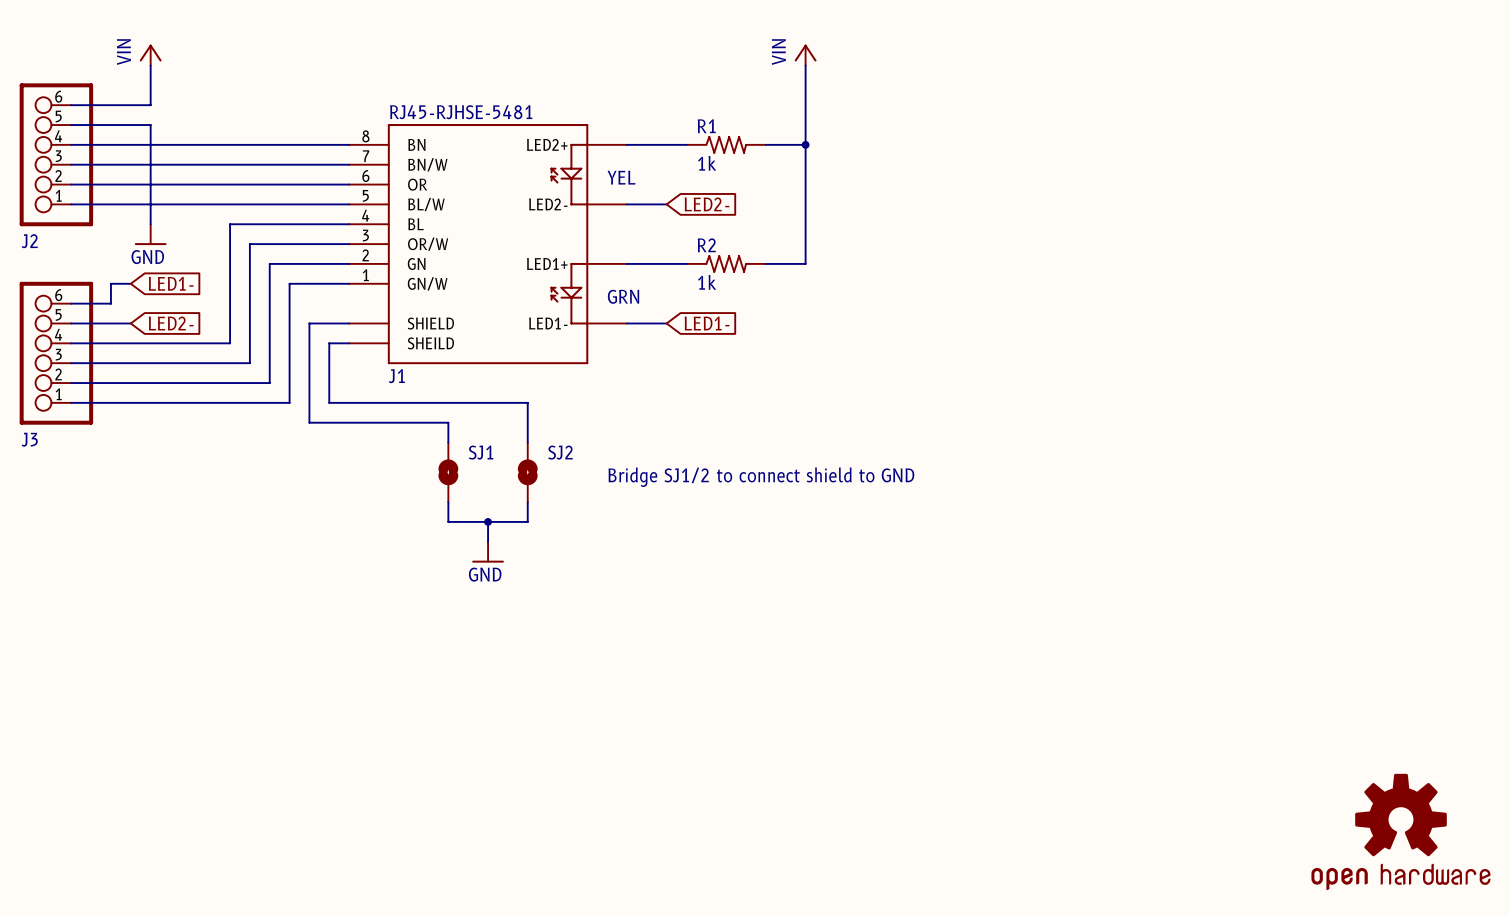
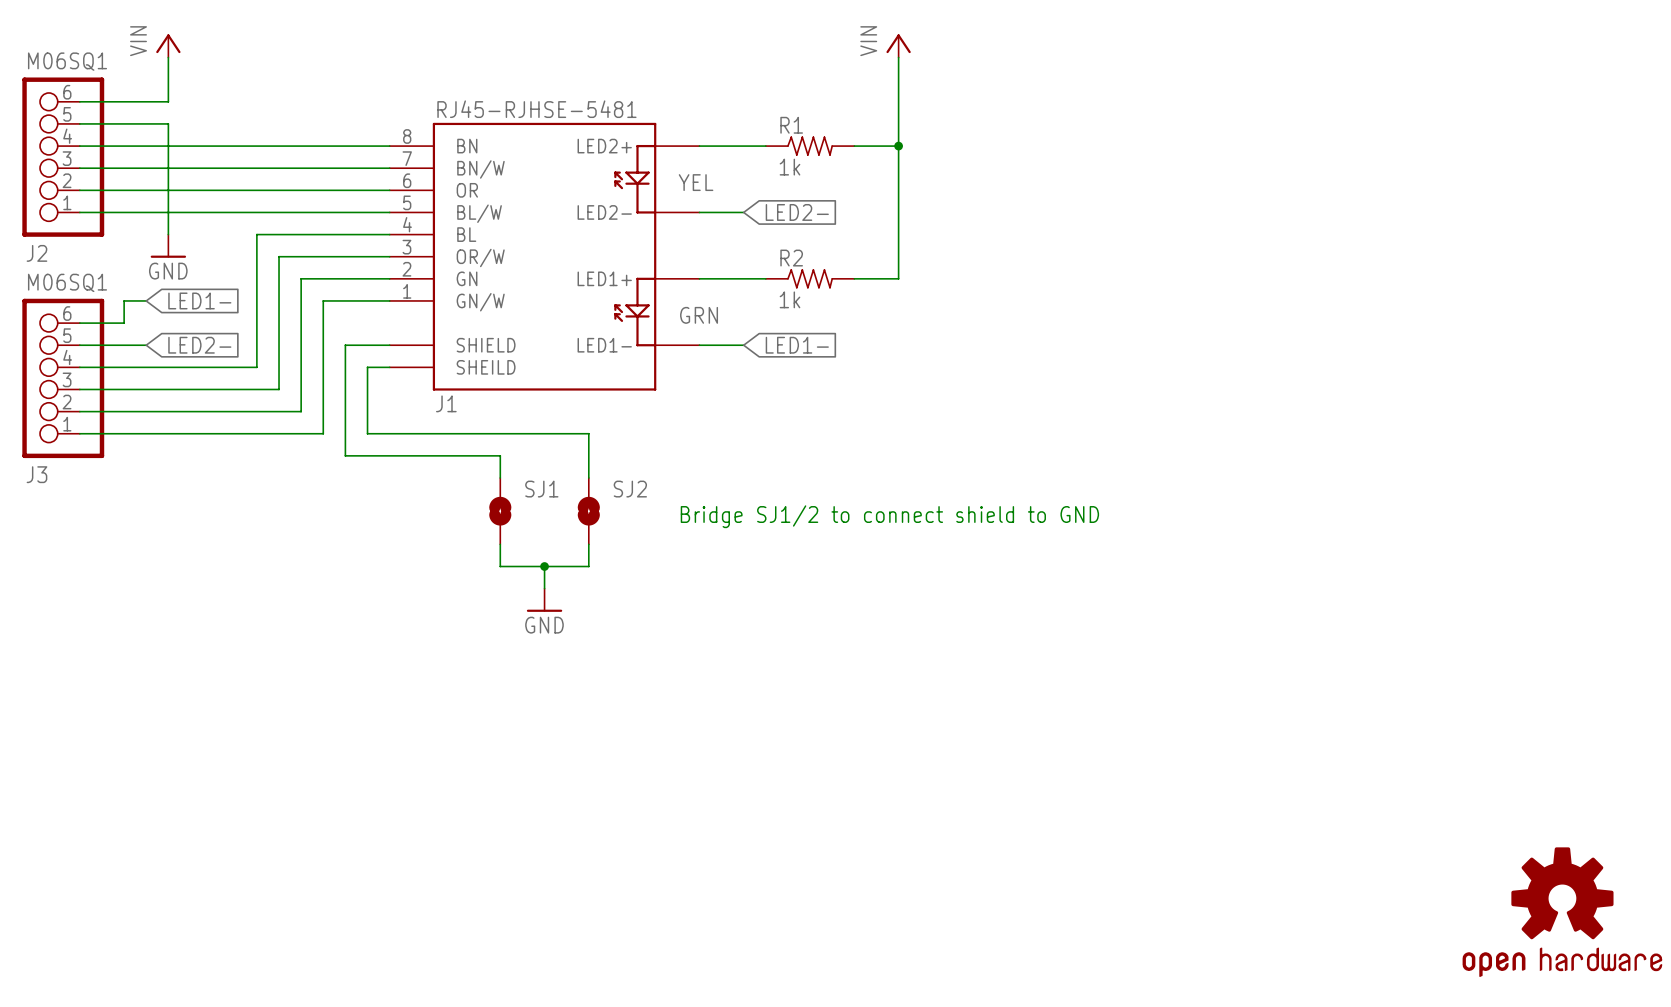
J2 value: none -> M06SQ1 (67, 61)
J3 value: none -> M06SQ1 (67, 282)

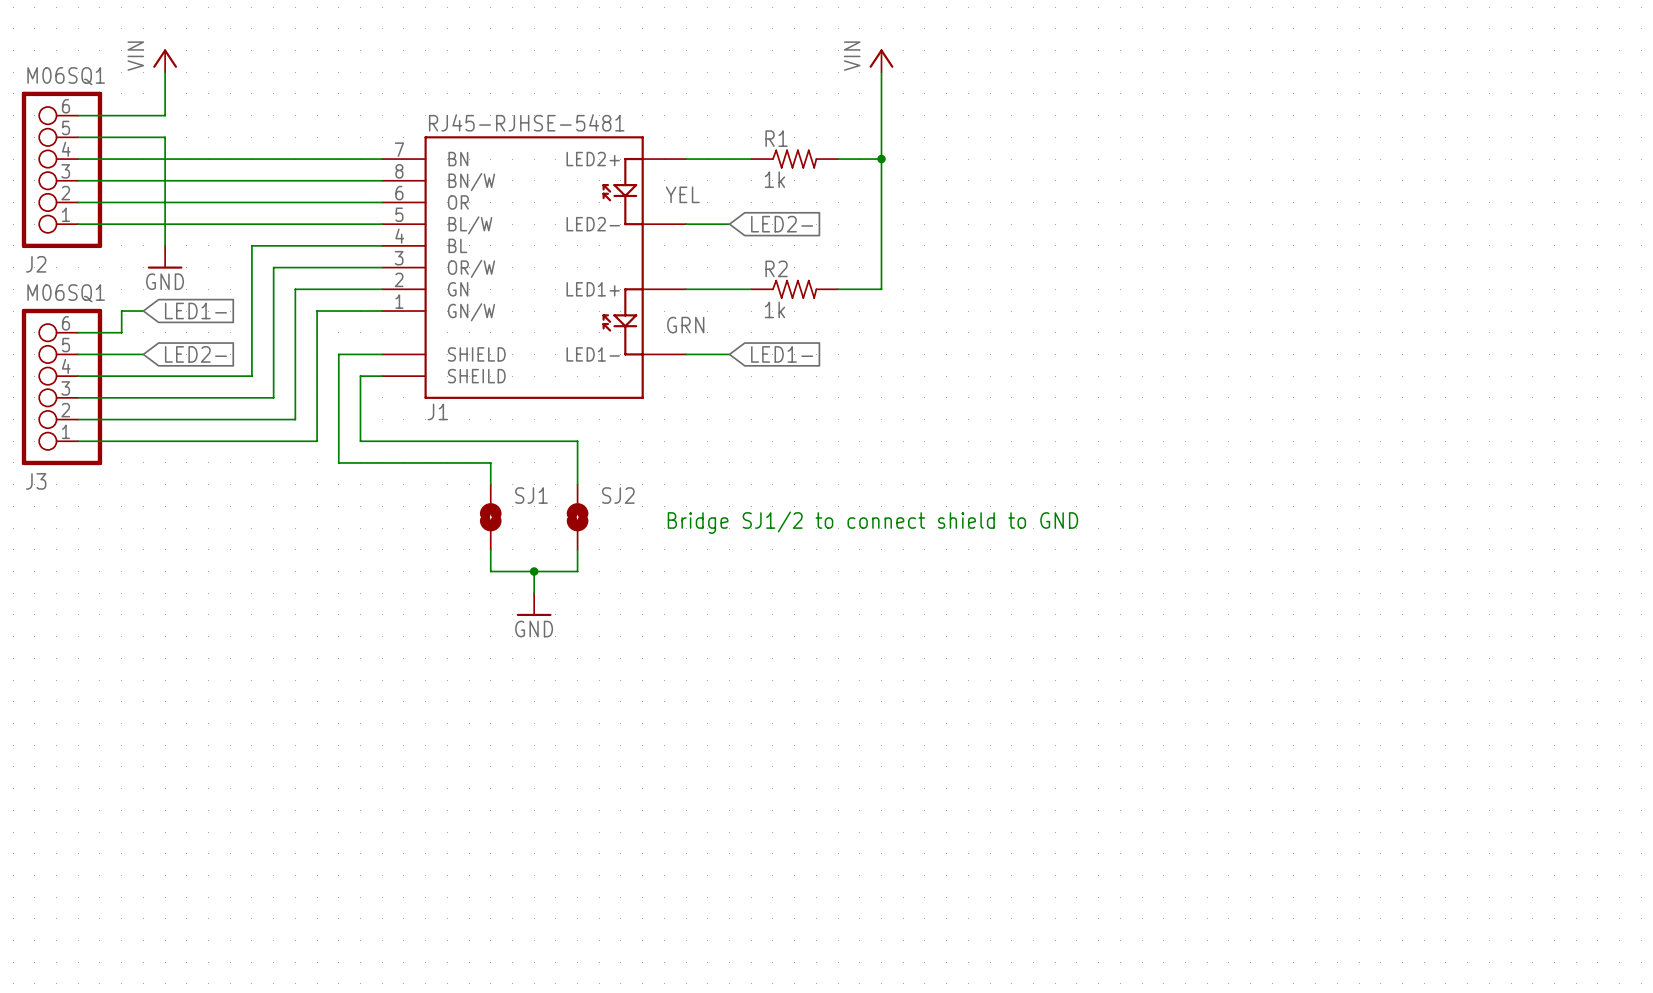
J1 pin number: 8 (407, 136) -> 7 (399, 149)
J1 pin number: 7 (407, 158) -> 8 (399, 171)
part: (1562, 912) -> none

